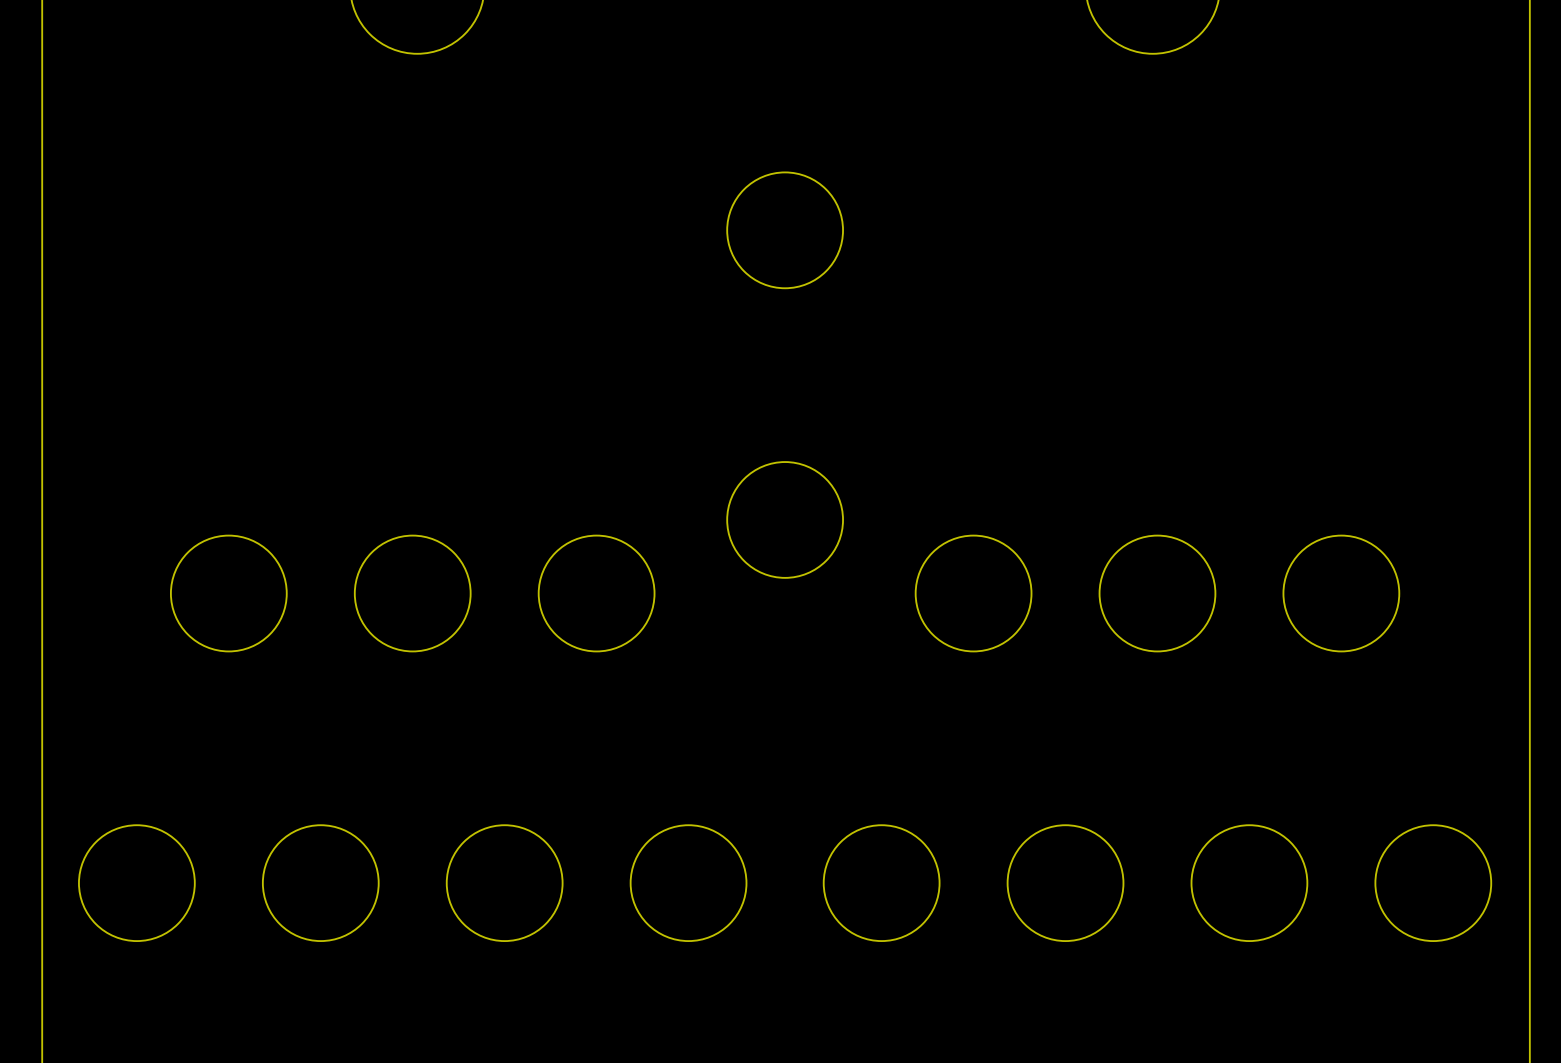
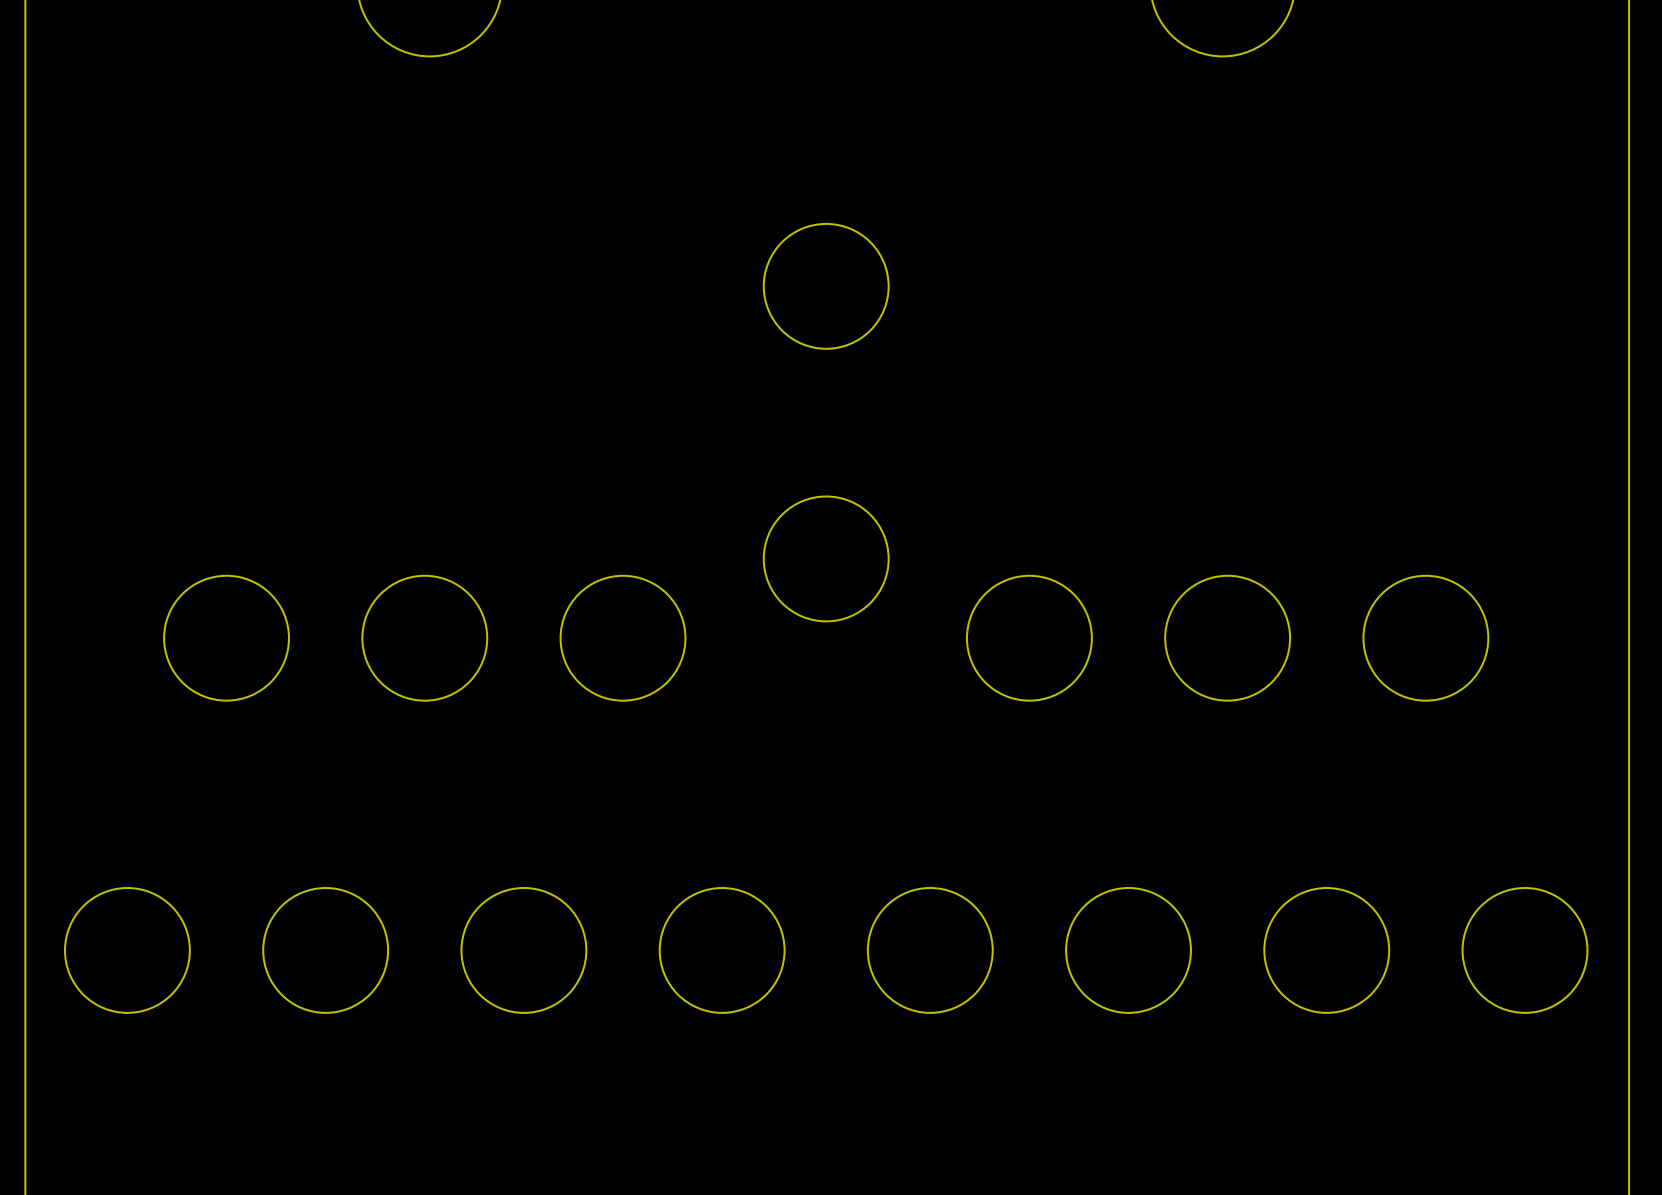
round board edge position: (785, 230) -> (826, 286)

